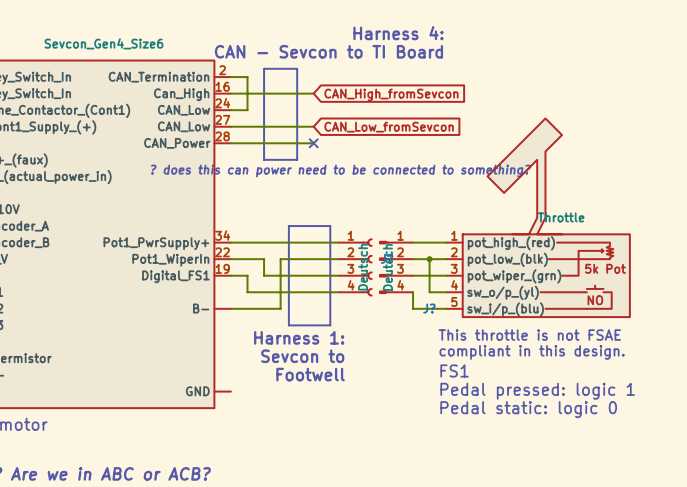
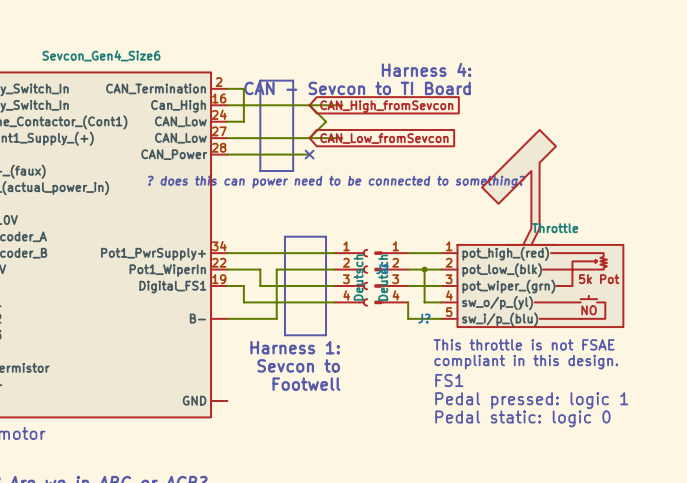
text position: Harness 4: (398, 33) -> Harness 4: (426, 69)
text position: CAN - Sevcon to TI Board (328, 51) -> CAN - Sevcon to TI Board (357, 88)
wire: none -> (342, 105) (309, 105) (326, 121) (309, 138) (342, 138)

